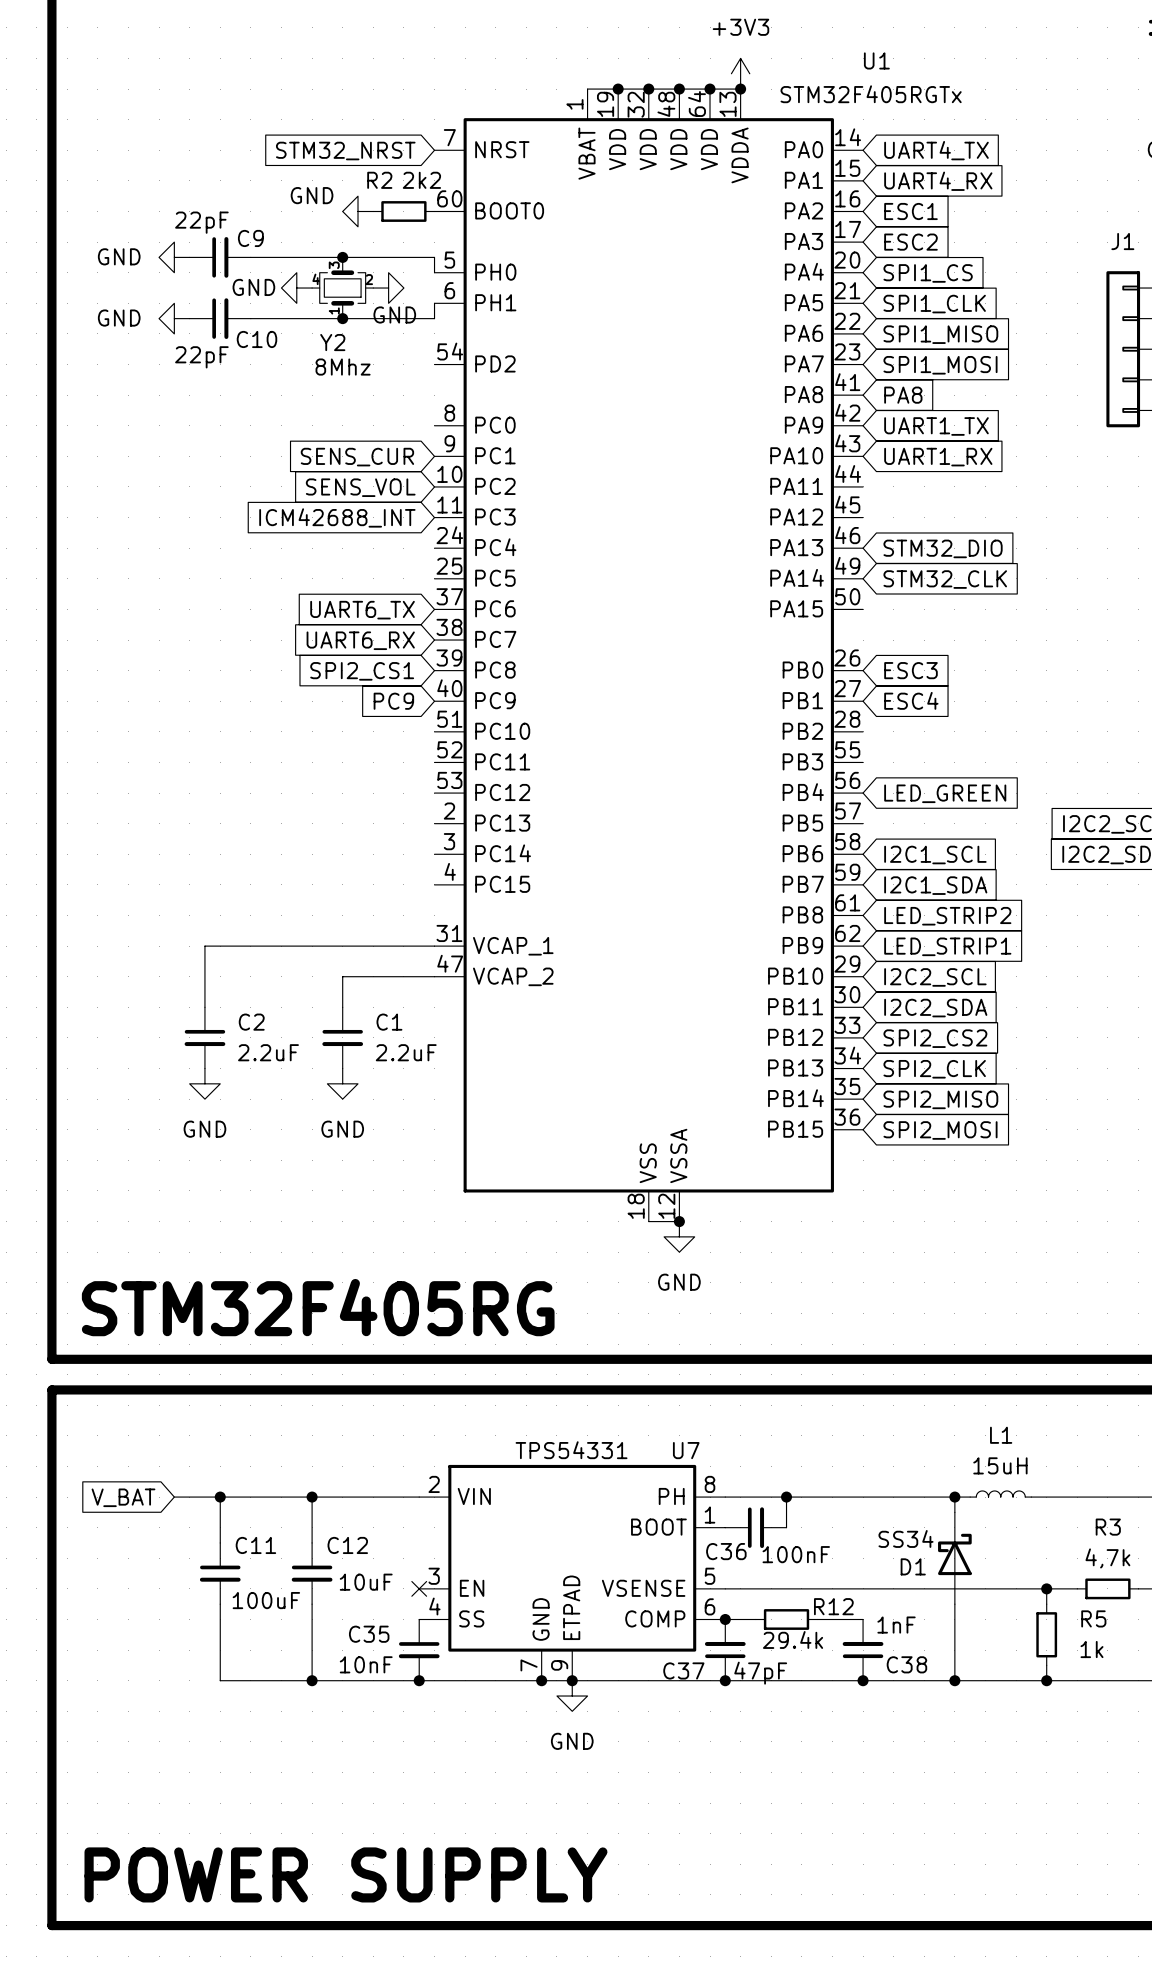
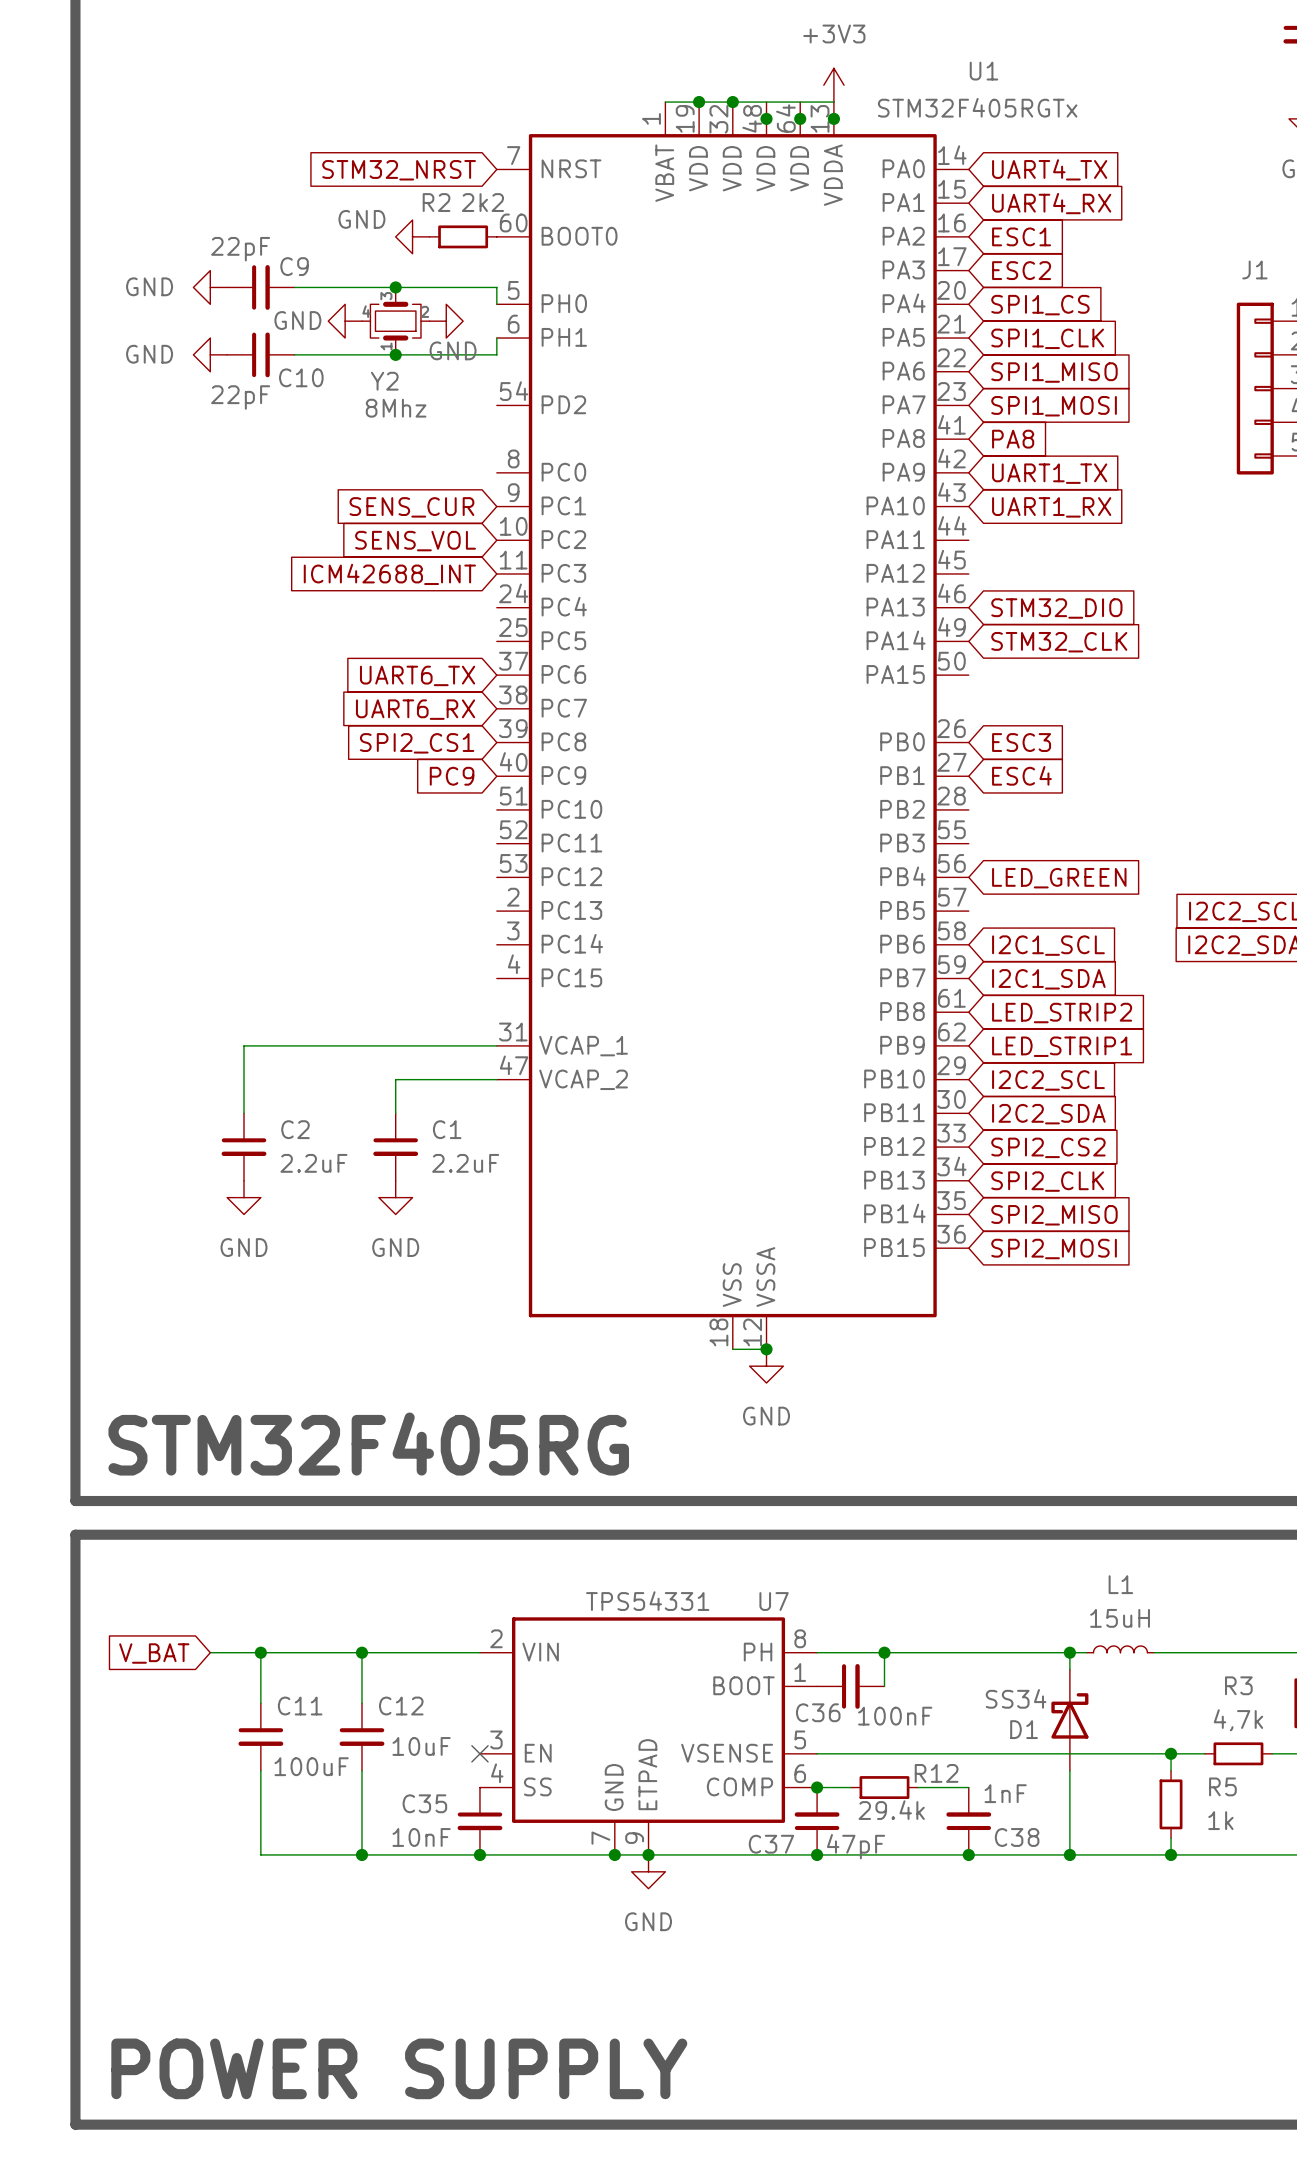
junction position: (679, 89) -> (766, 118)
junction position: (710, 89) -> (800, 118)
junction position: (740, 89) -> (833, 118)

